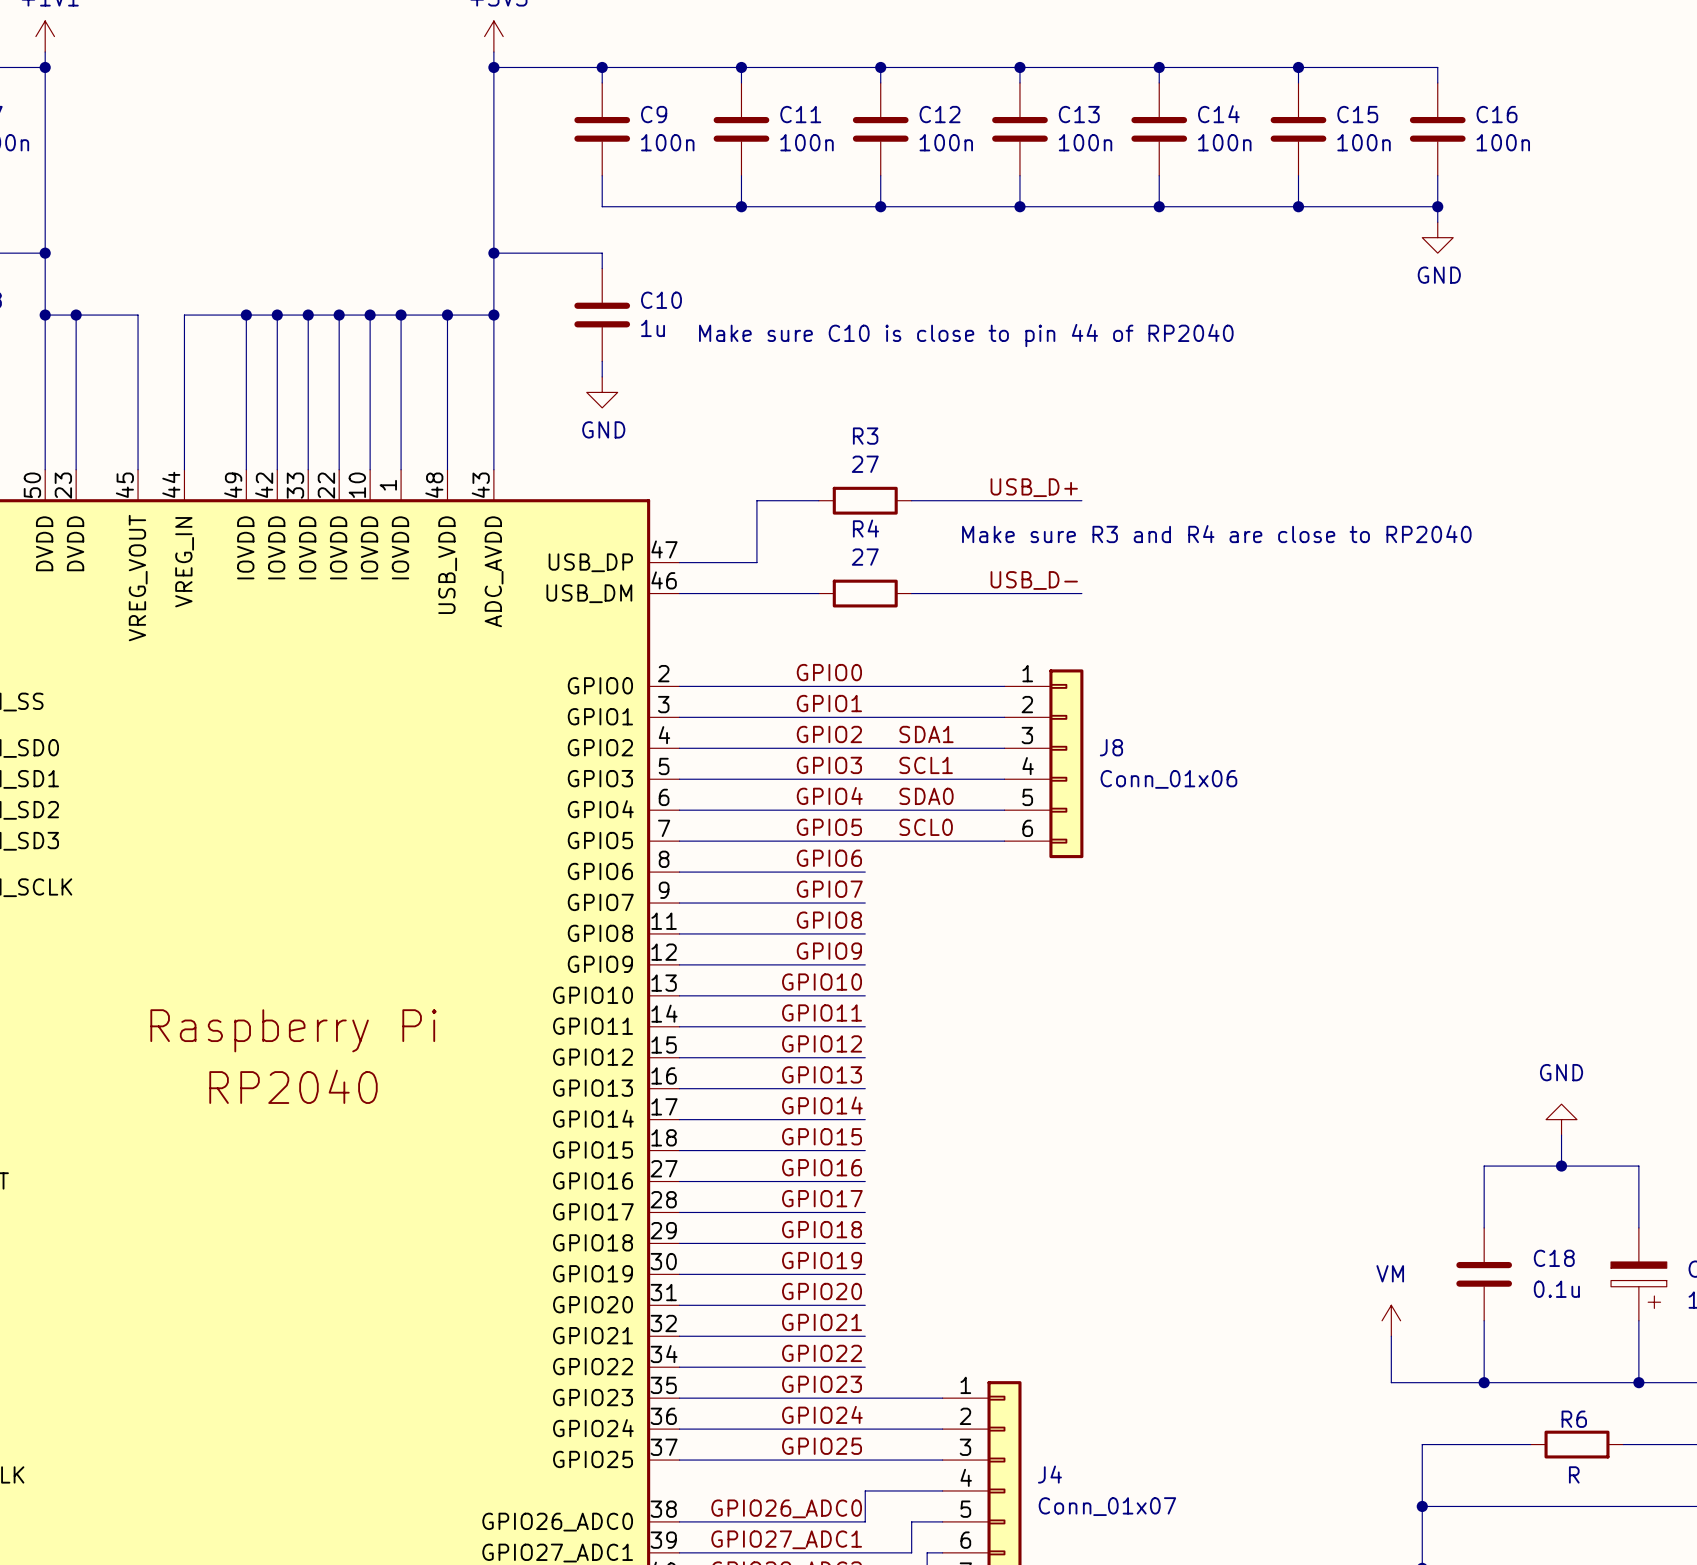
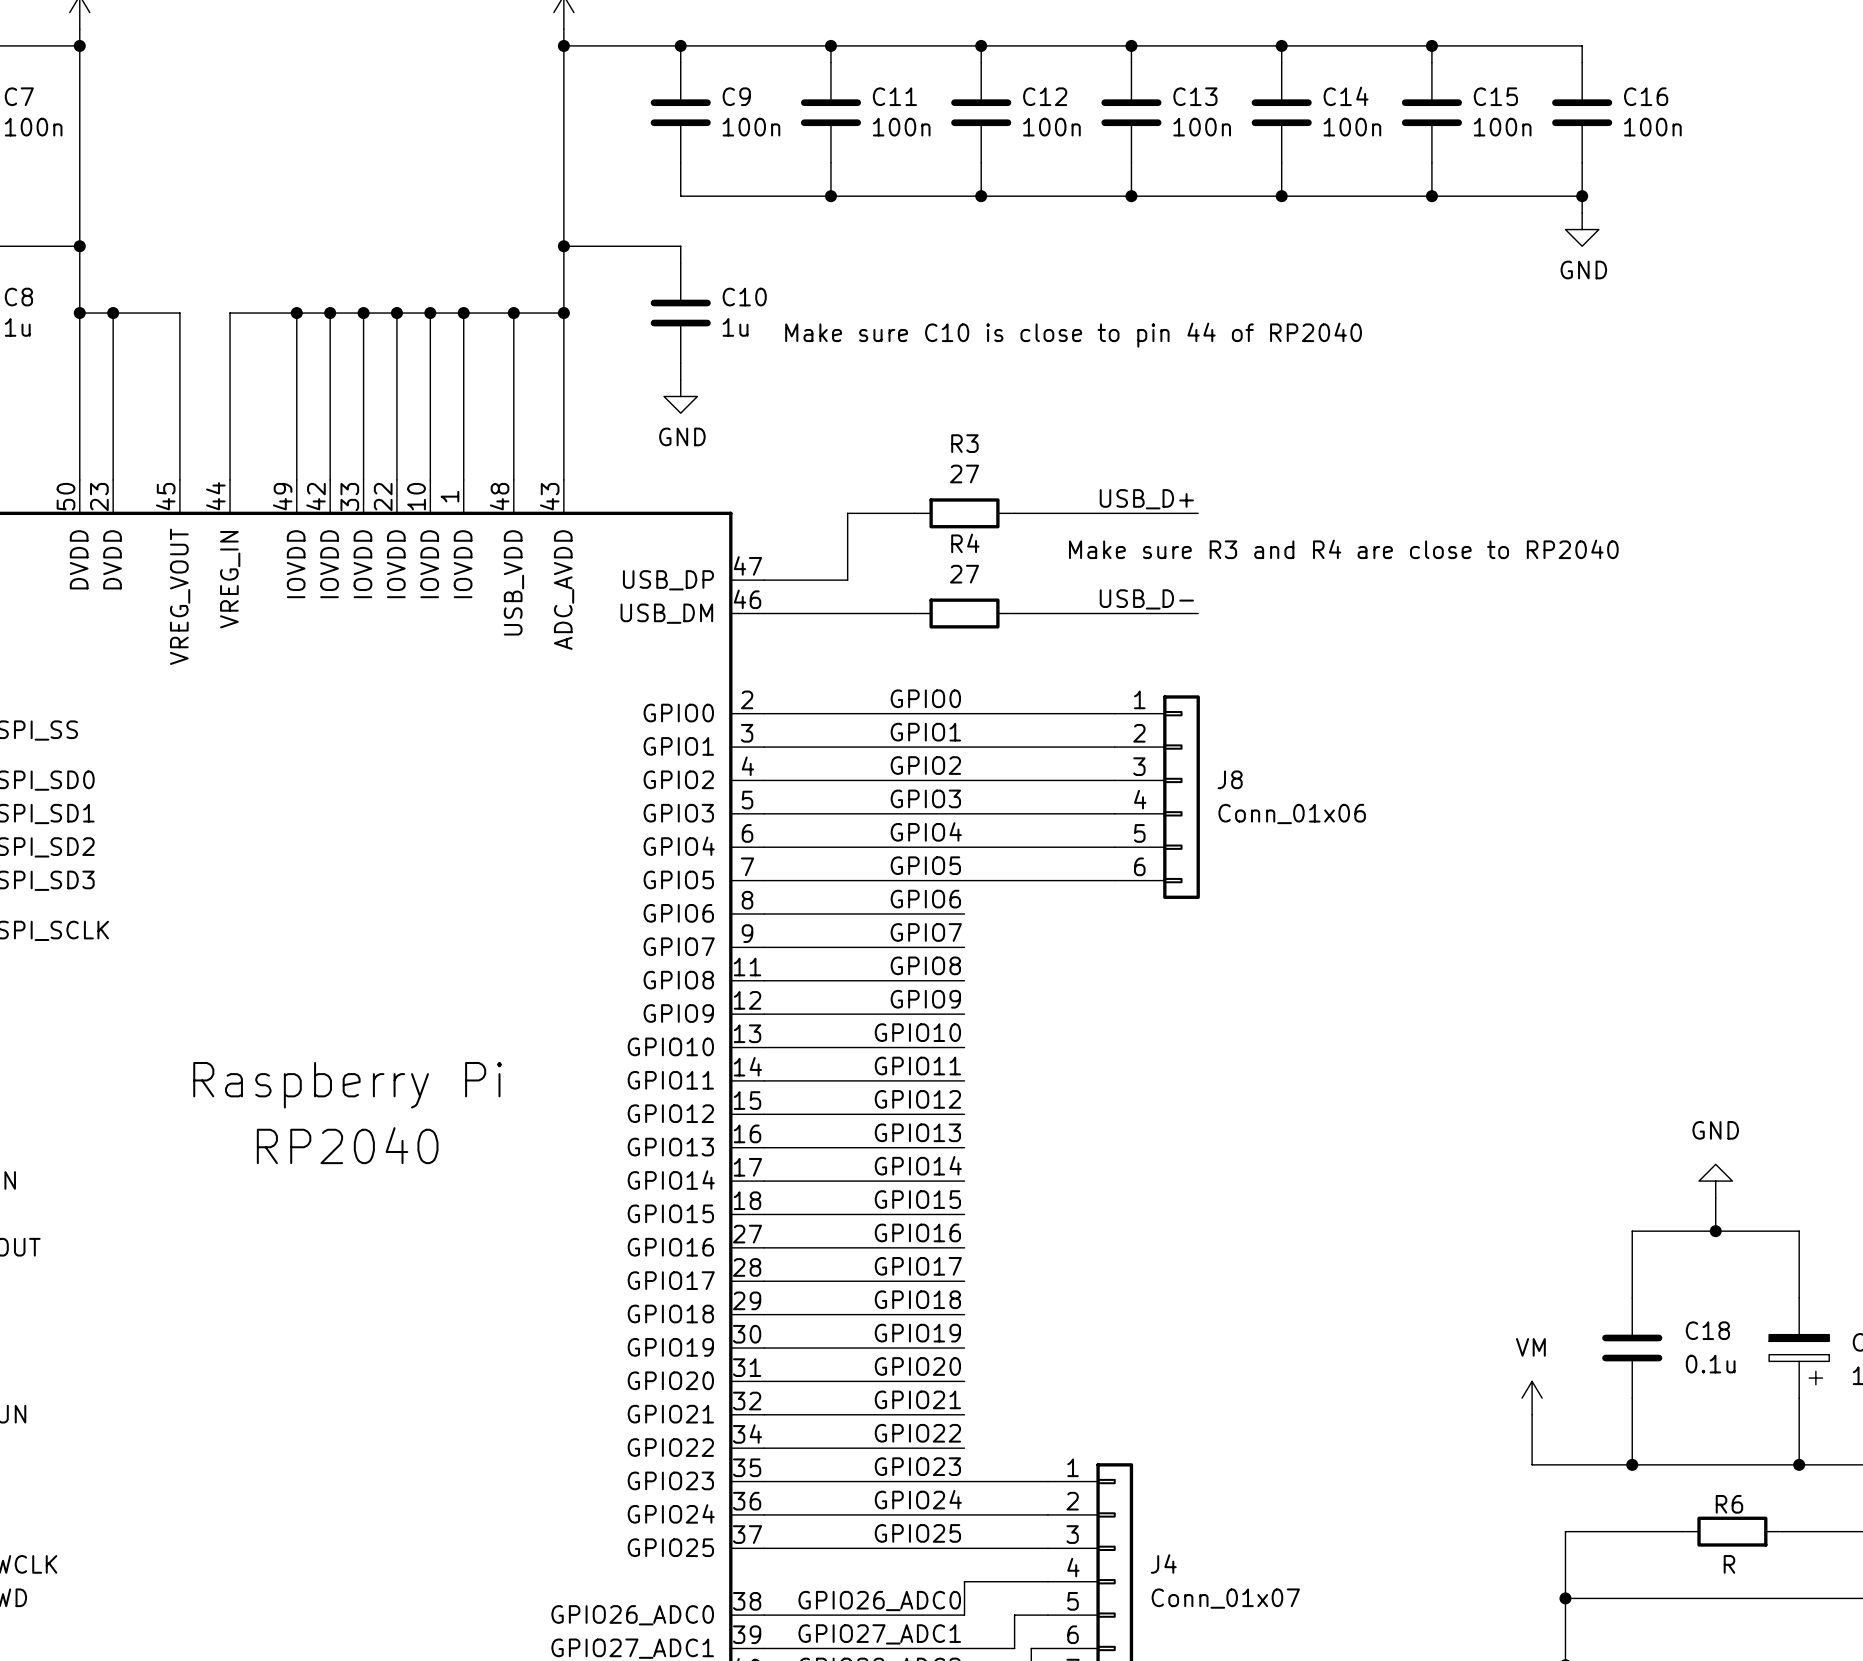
label: SDA1 (926, 734) -> none
label: SCL1 (926, 765) -> none
label: SDA0 (926, 796) -> none
label: SCL0 (926, 827) -> none

